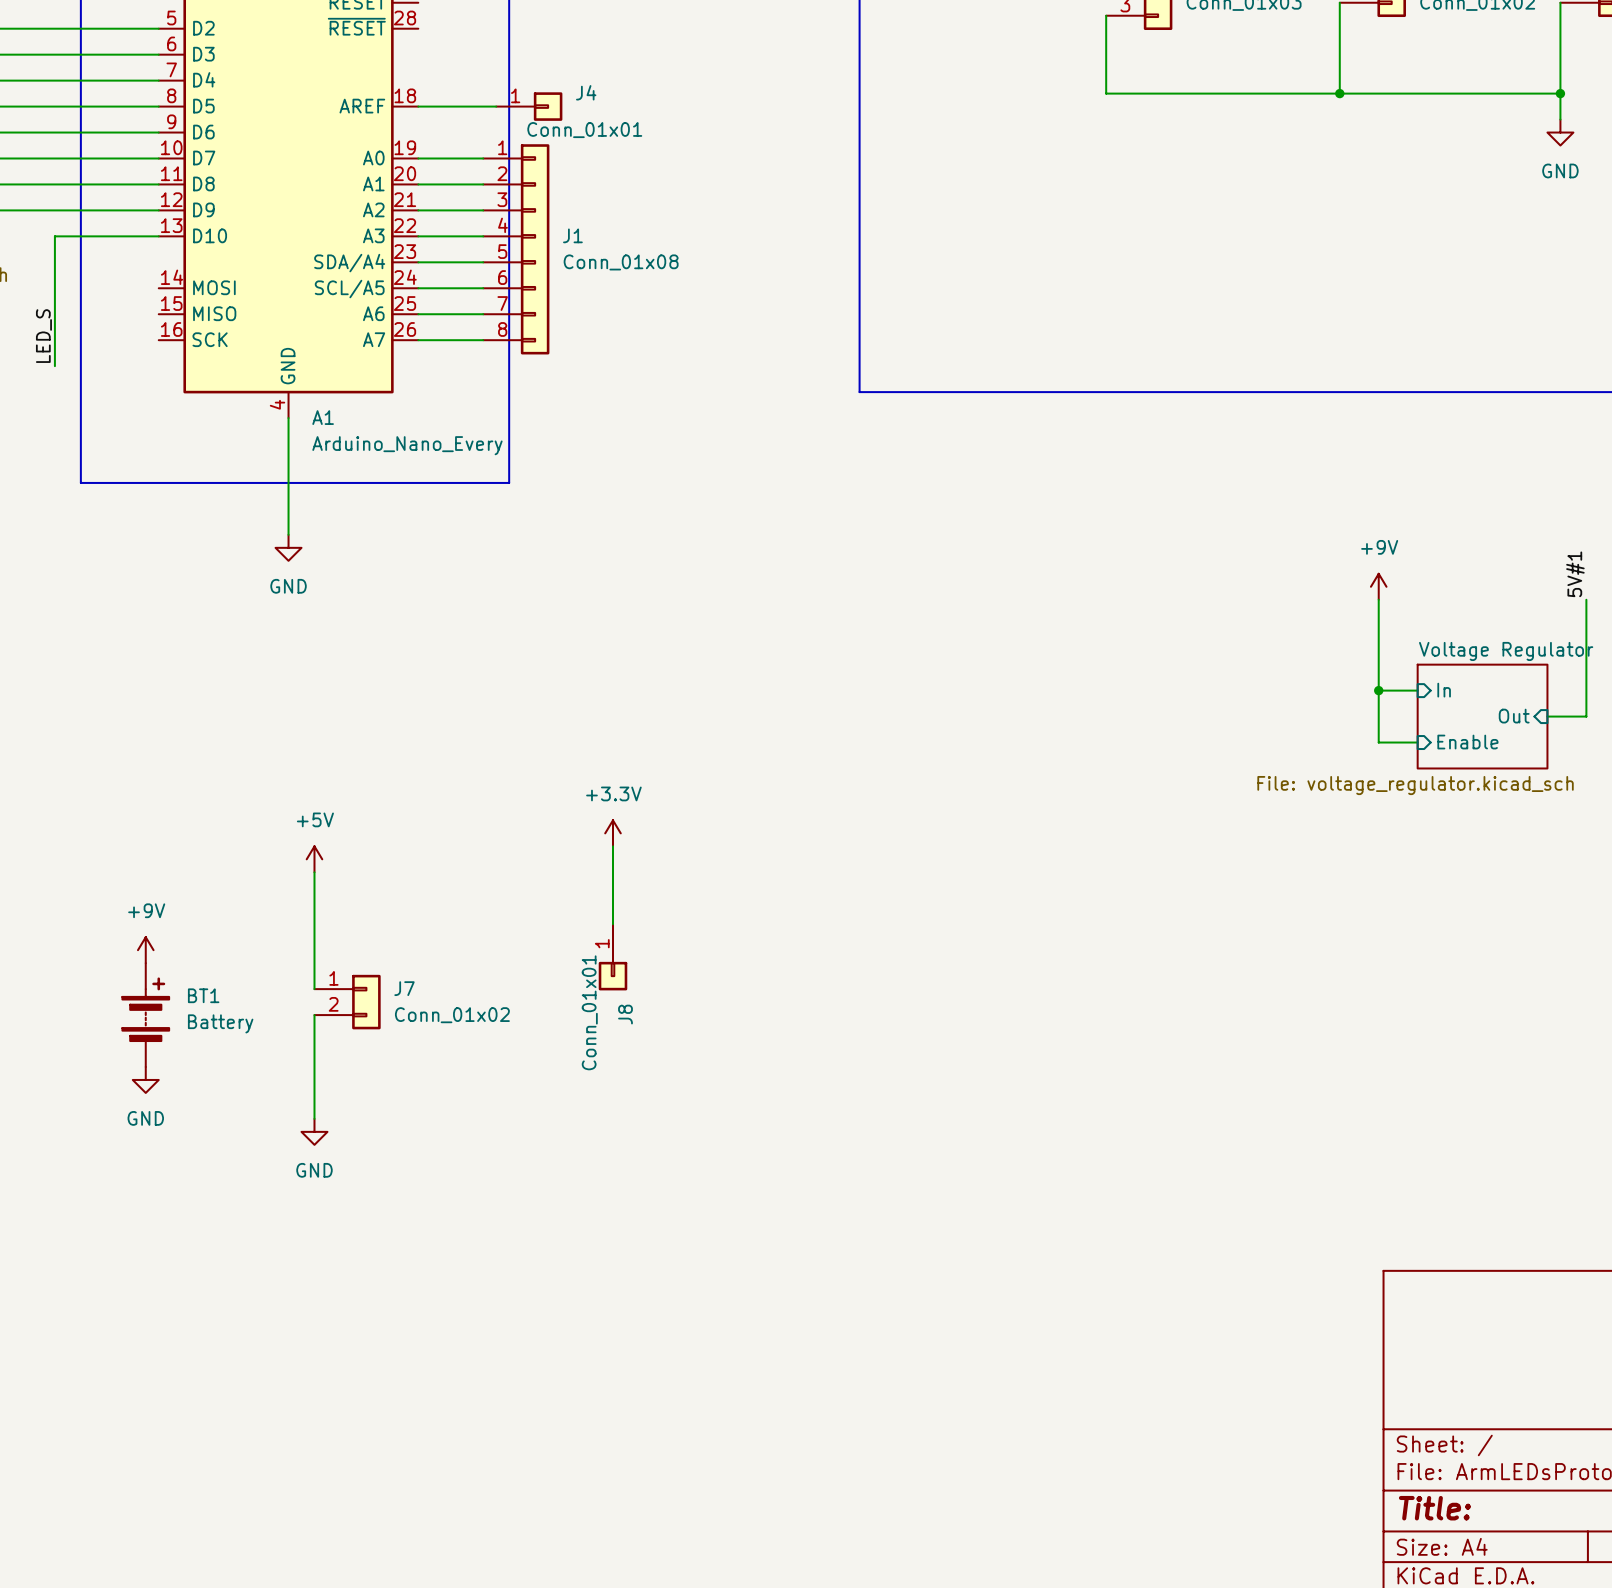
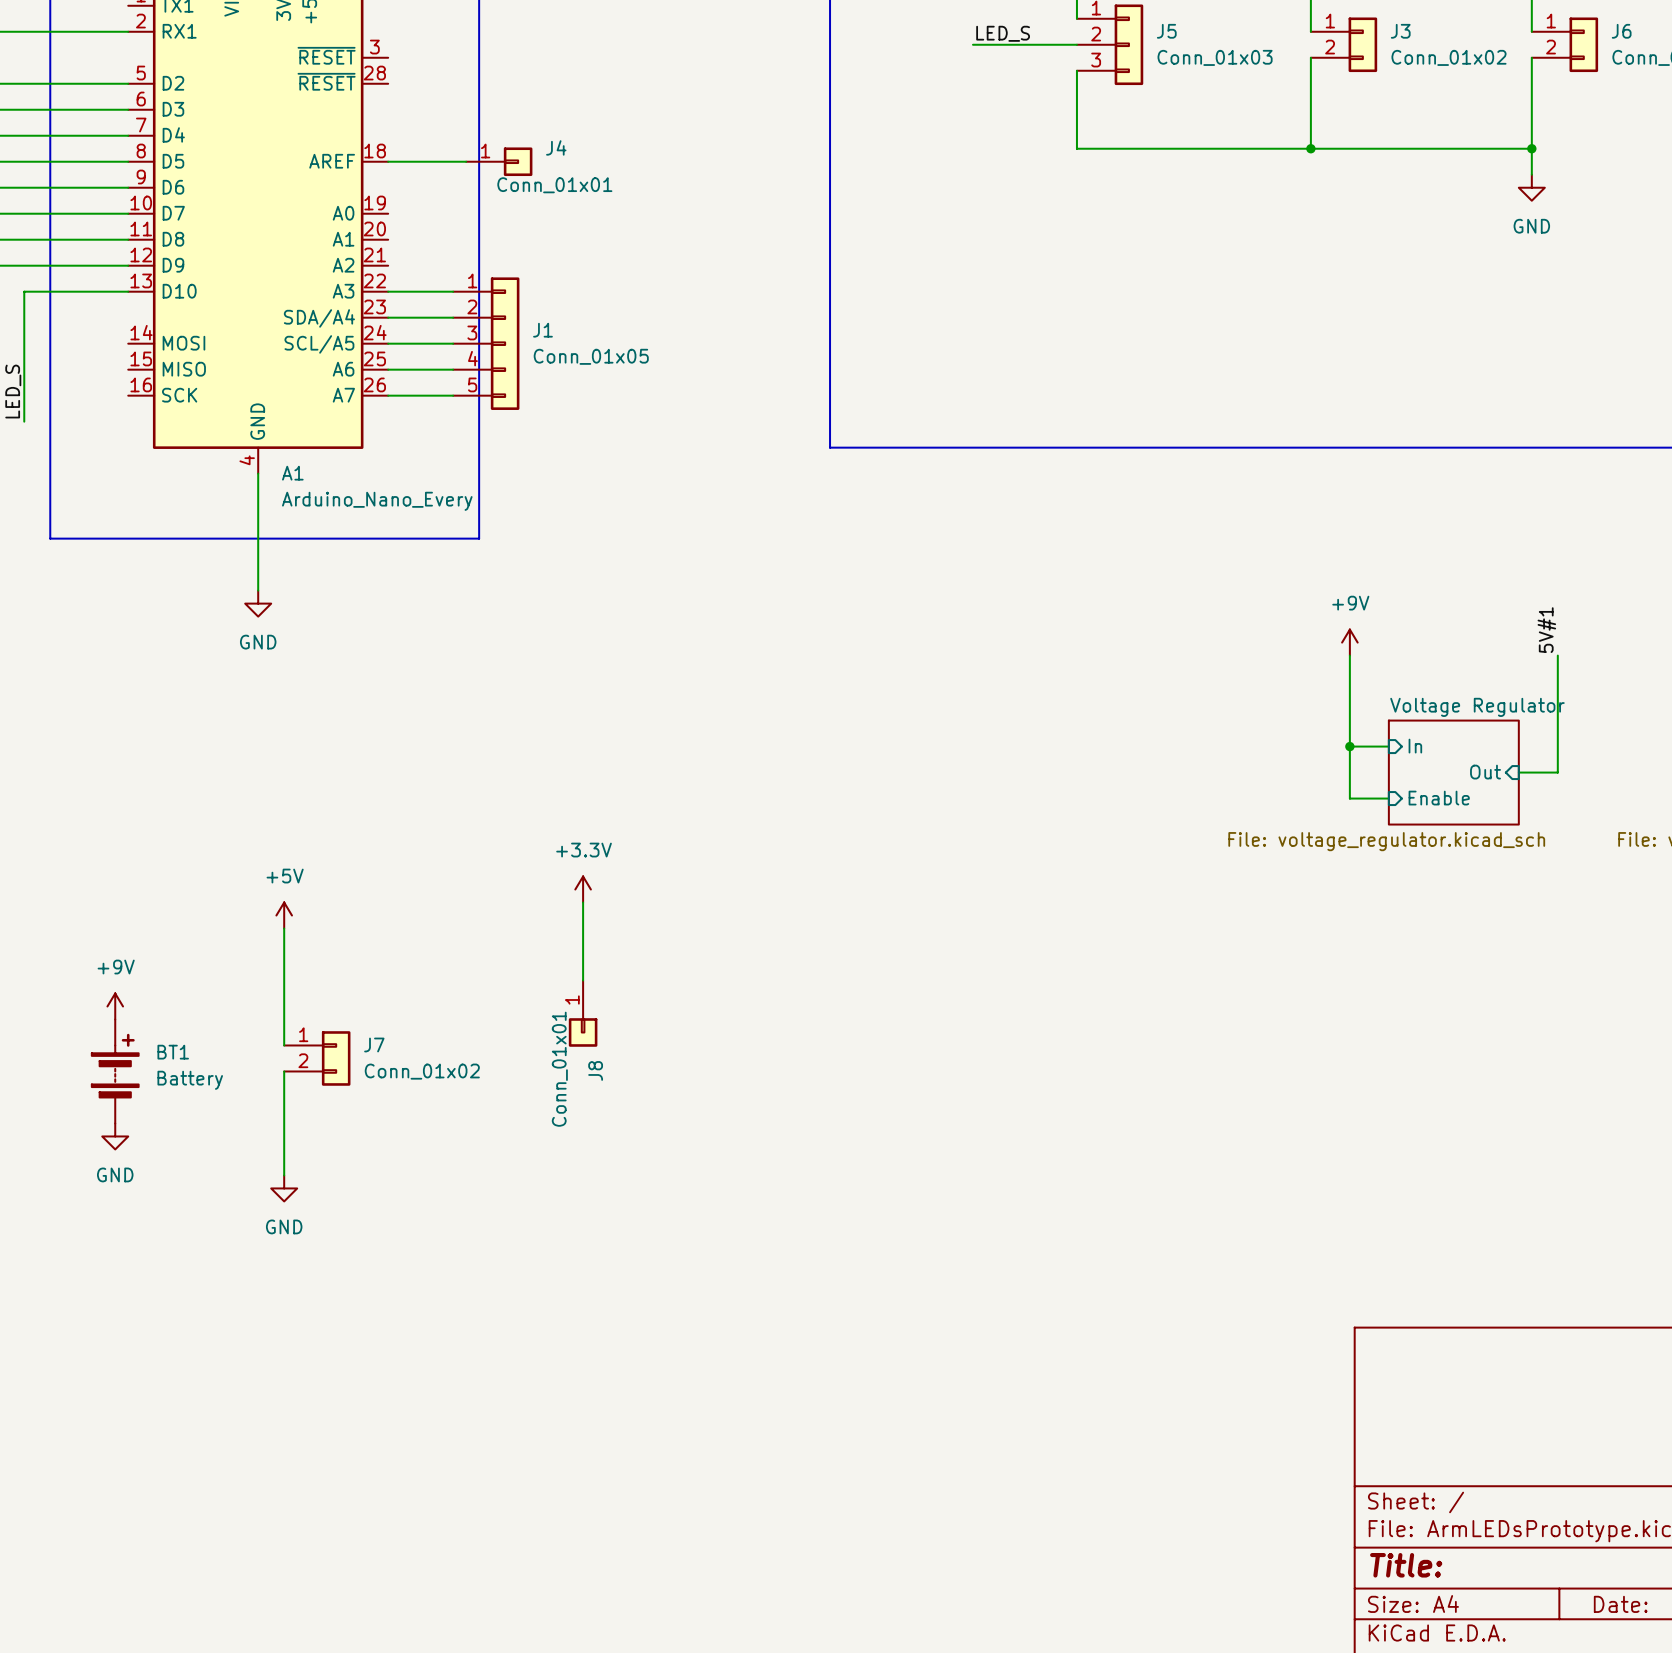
J1 symbol: [483, 144, 550, 355] -> [453, 277, 520, 410]
wire: (418, 158) (483, 158) -> none
wire: (418, 184) (483, 184) -> none
wire: (418, 210) (483, 210) -> none
J1 value: Conn_01x08 (621, 262) -> Conn_01x05 (591, 356)

